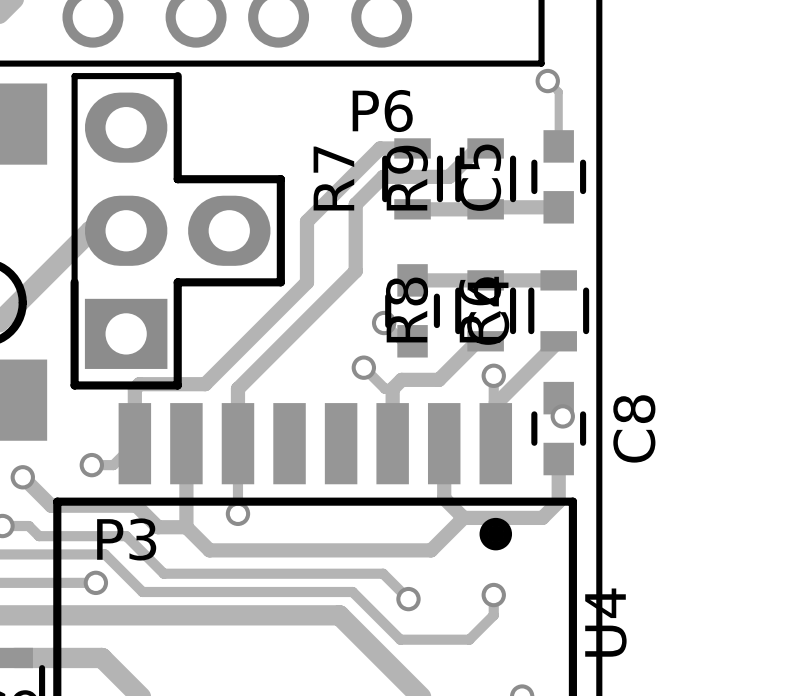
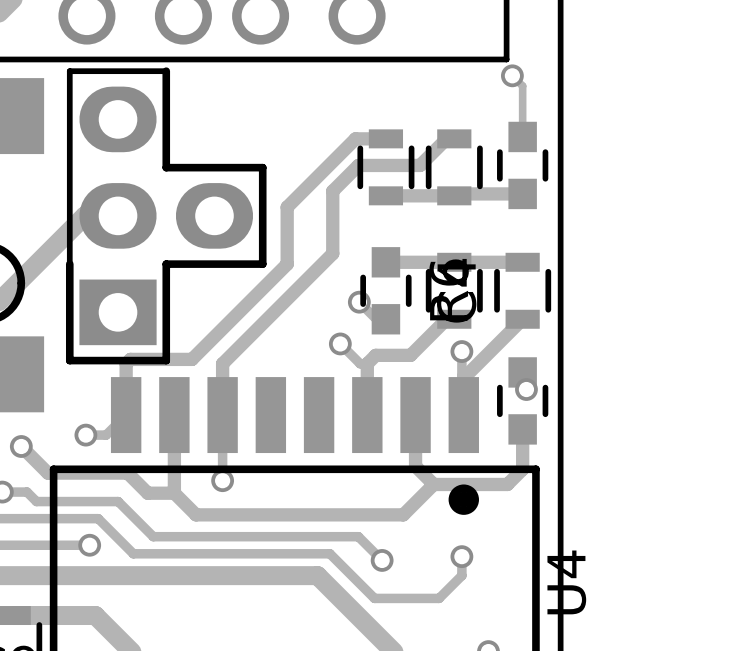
P6 name: P6 (382, 111) -> none
C5 name: C5 (480, 177) -> none
R7 name: R7 (333, 178) -> none
R9 name: R9 (407, 178) -> none
R8 name: R8 (407, 310) -> none
C8 name: C8 (634, 428) -> none
P3 name: P3 (126, 539) -> none

